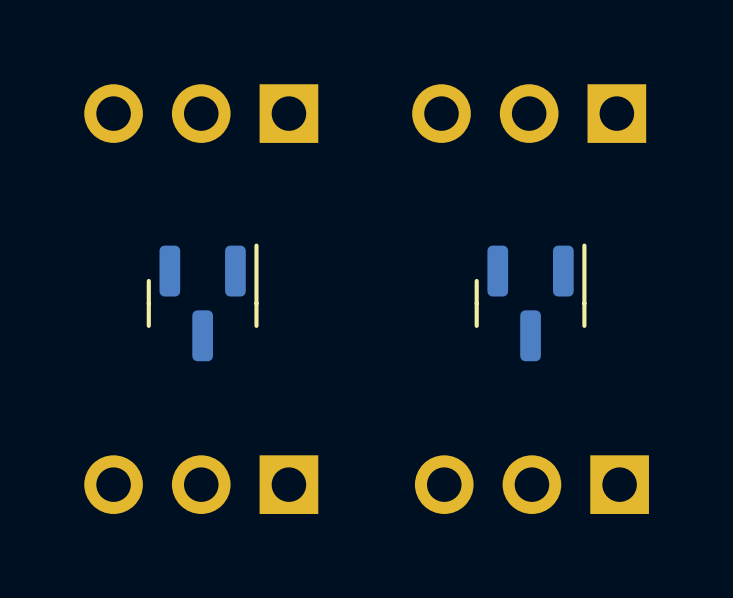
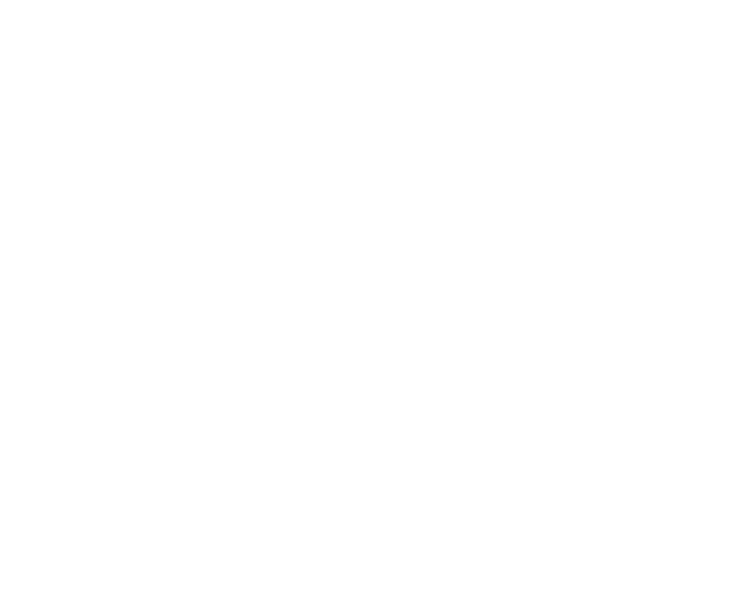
part: (201, 113) -> none
part: (529, 113) -> none
part: (202, 302) -> none
part: (530, 302) -> none
part: (201, 484) -> none
part: (531, 484) -> none

